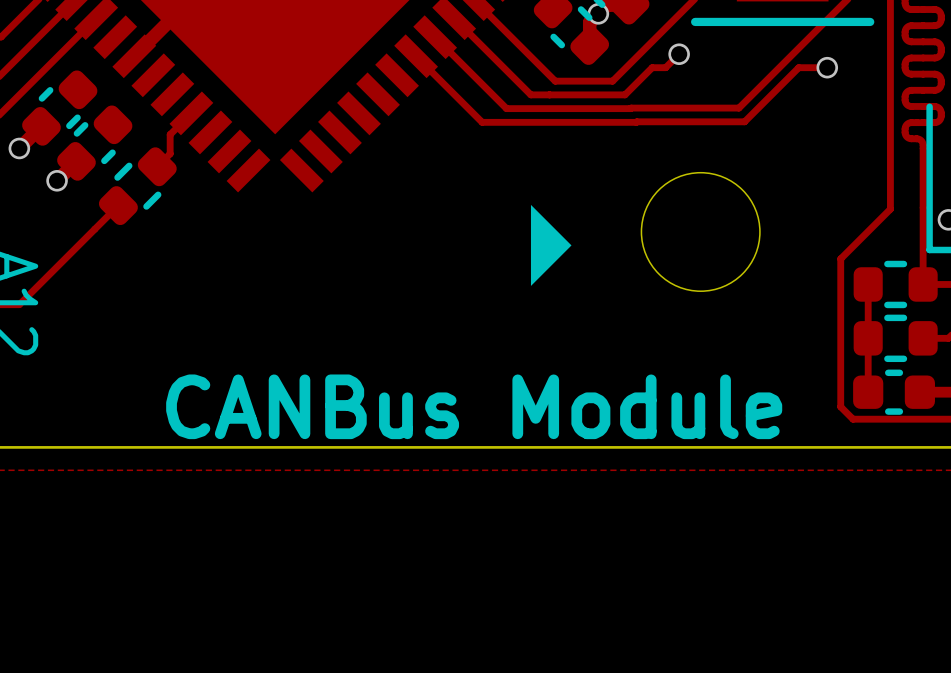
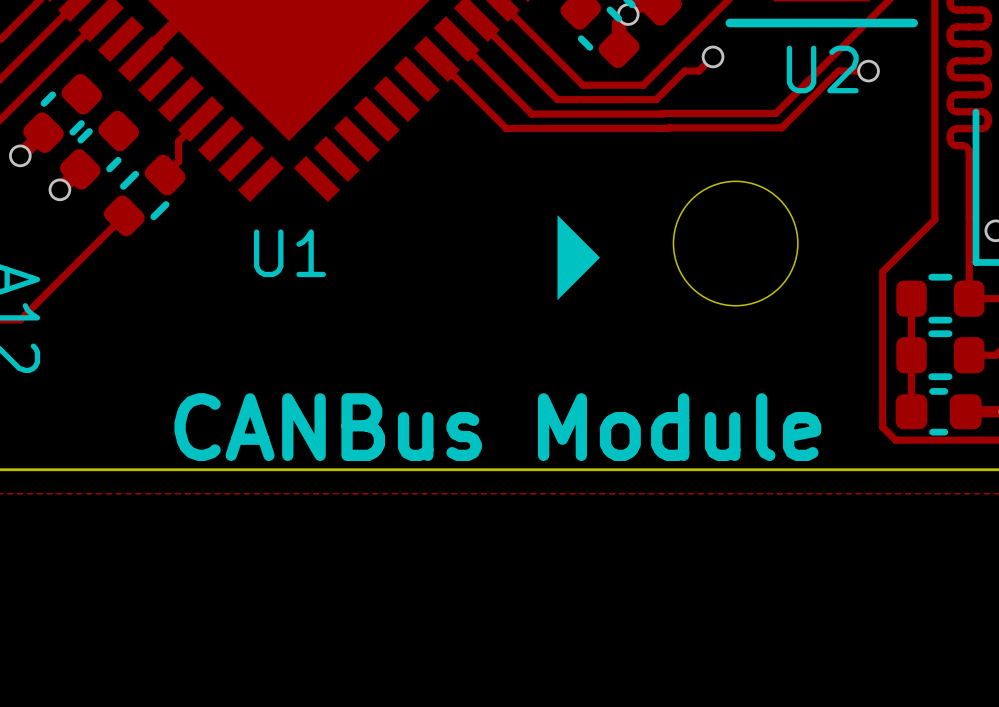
U2 name: none -> U2 (822, 69)
U1 name: none -> U1 (289, 253)

